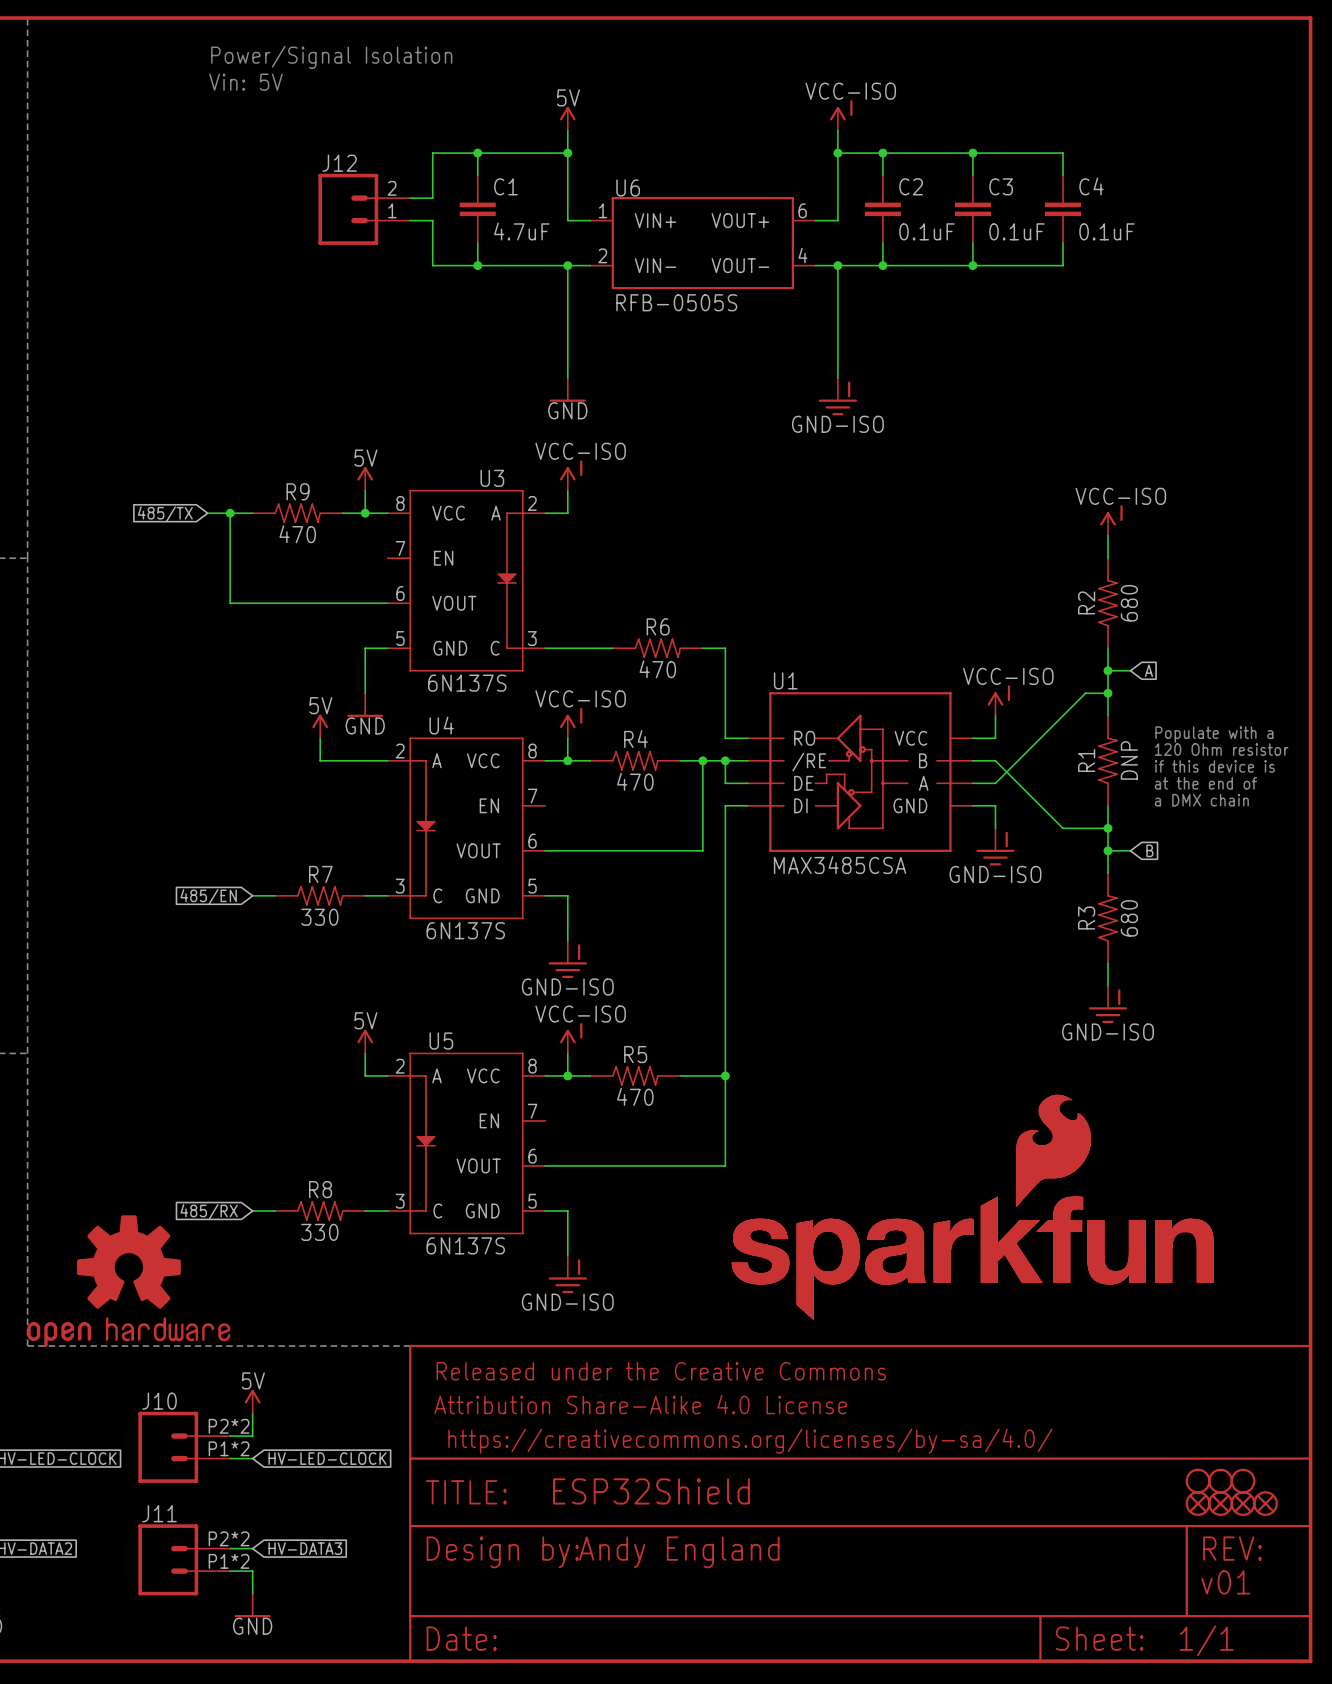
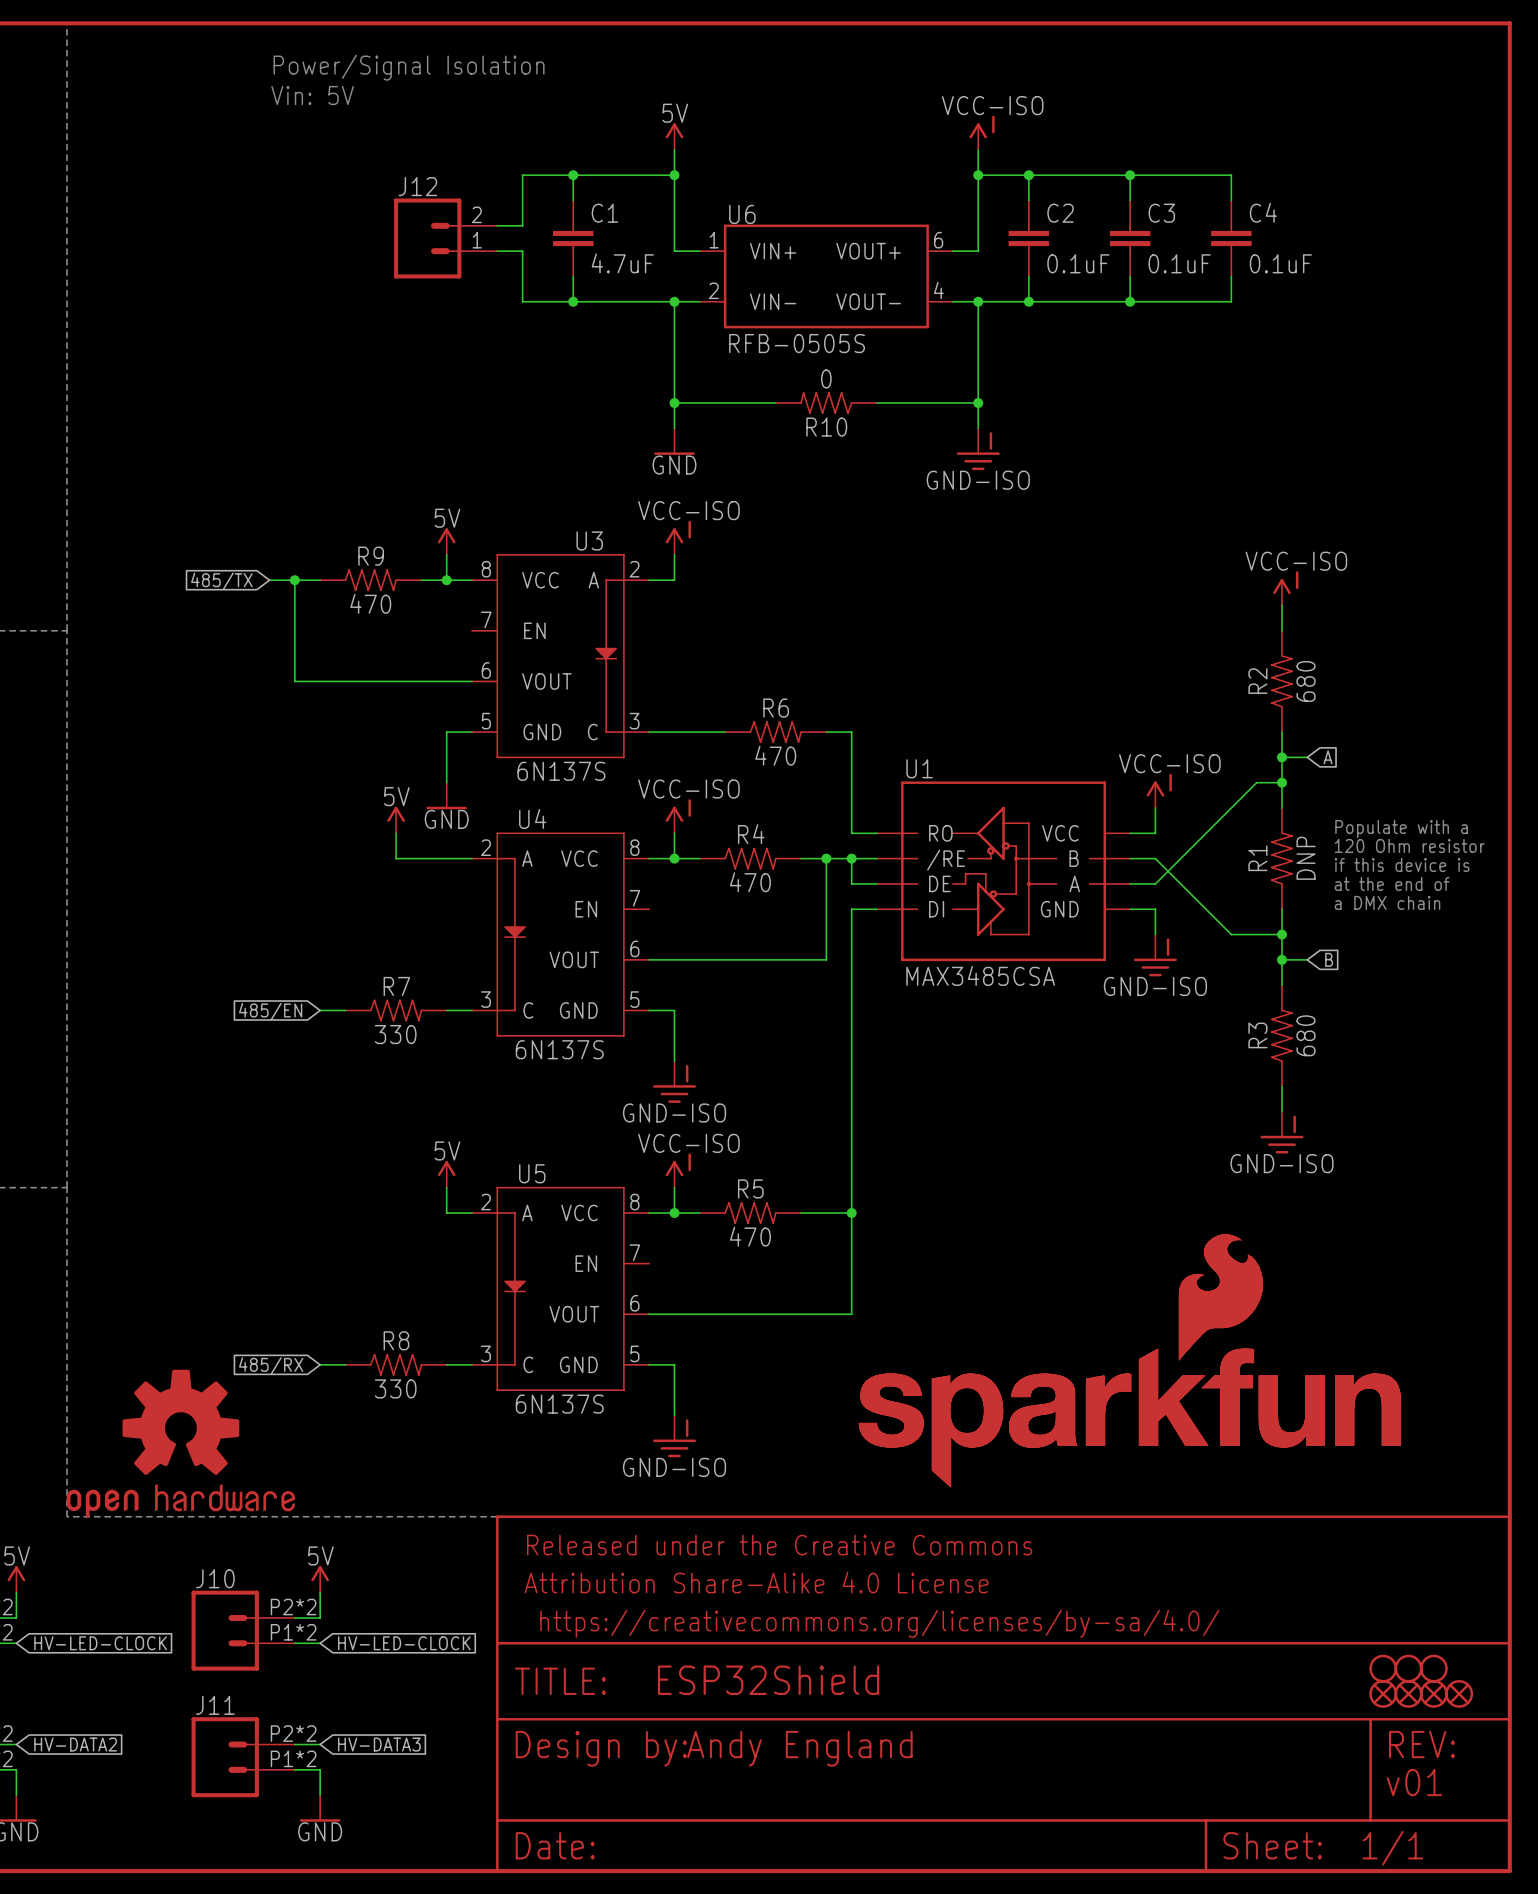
wire: none -> (674, 403) (775, 403)
junction: none -> (674, 403)
R10: none -> 0 (826, 403)
wire: none -> (876, 403) (978, 403)
junction: none -> (978, 403)

